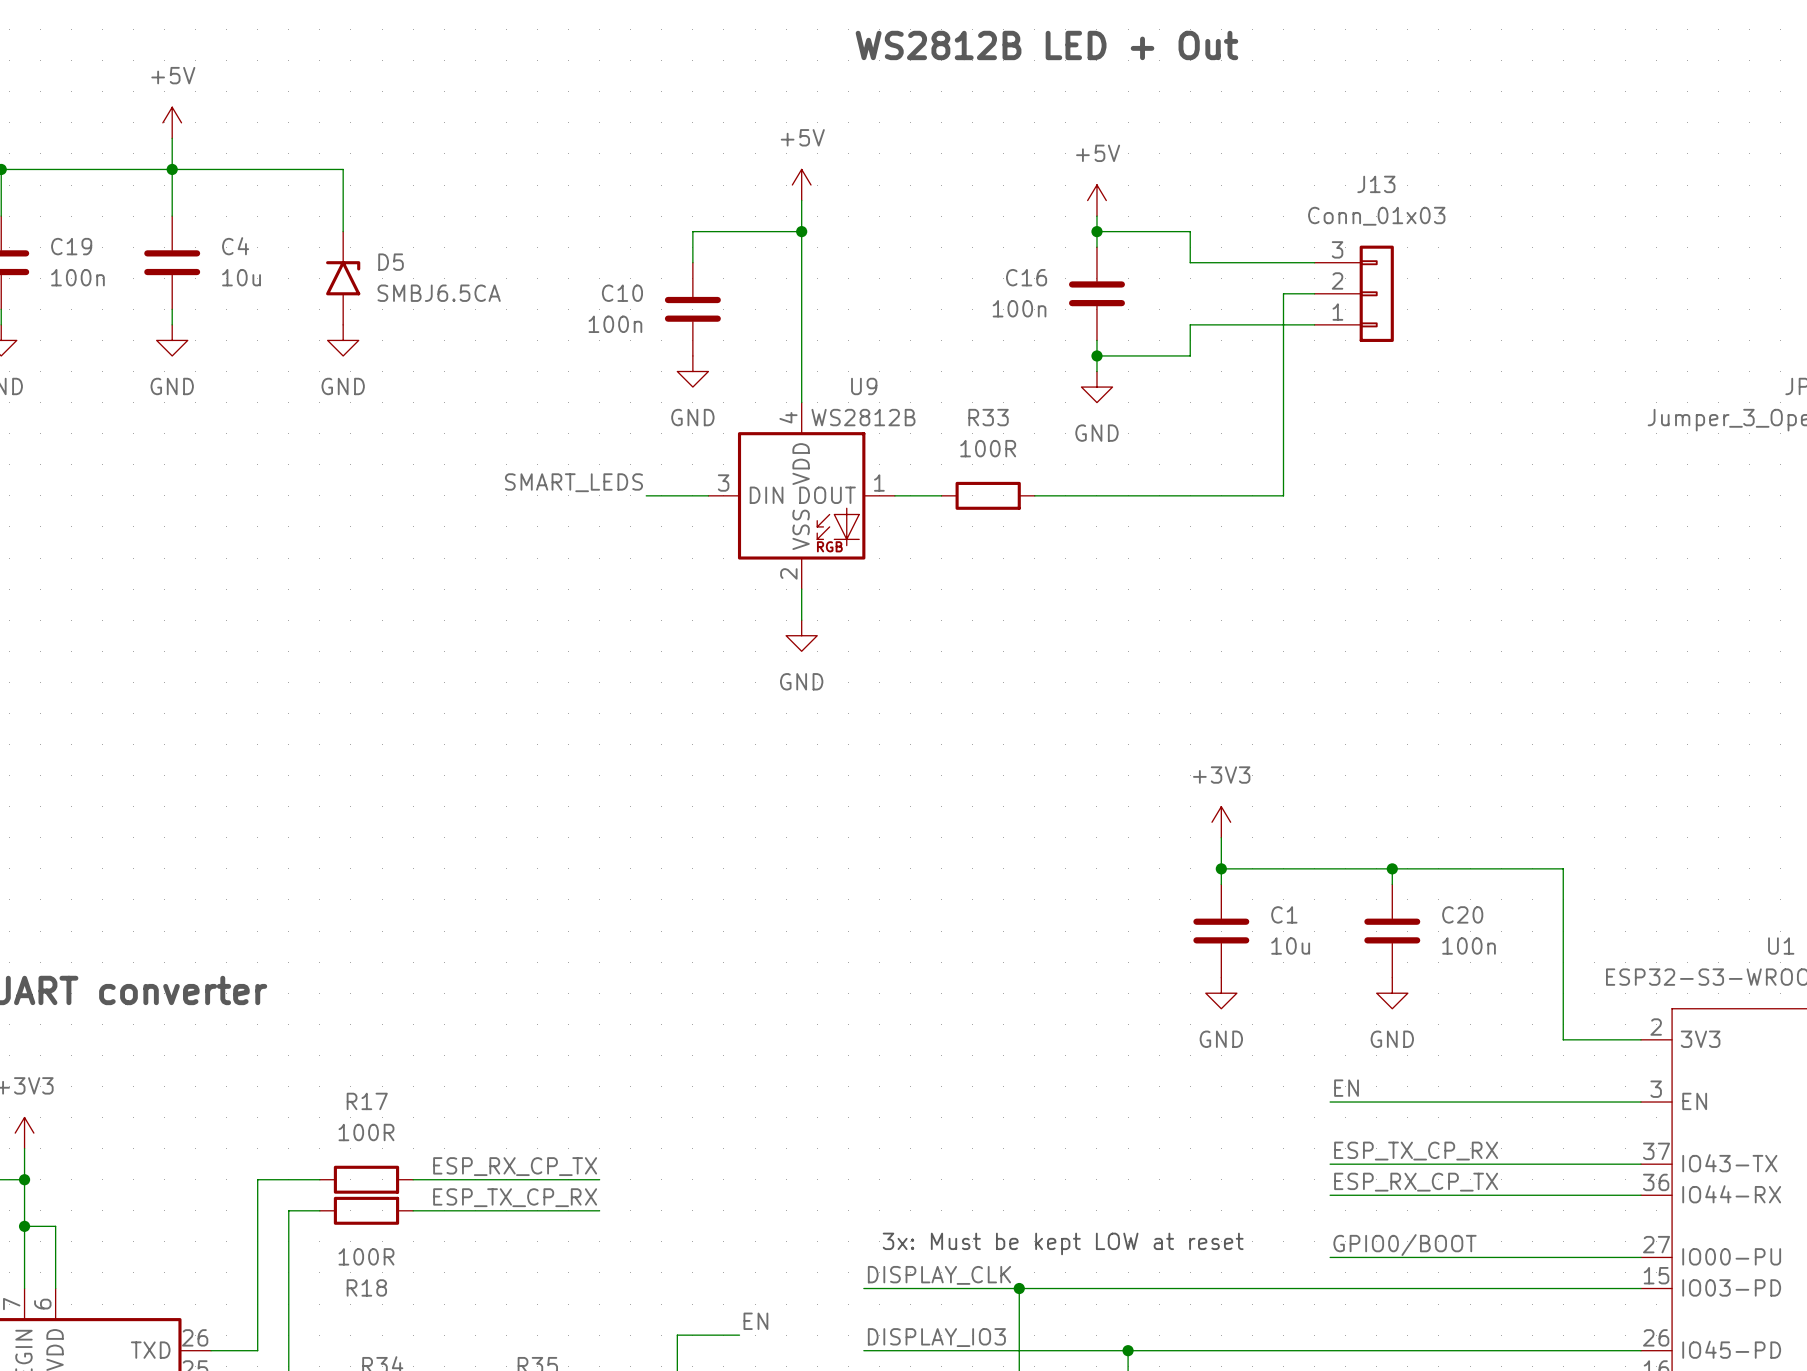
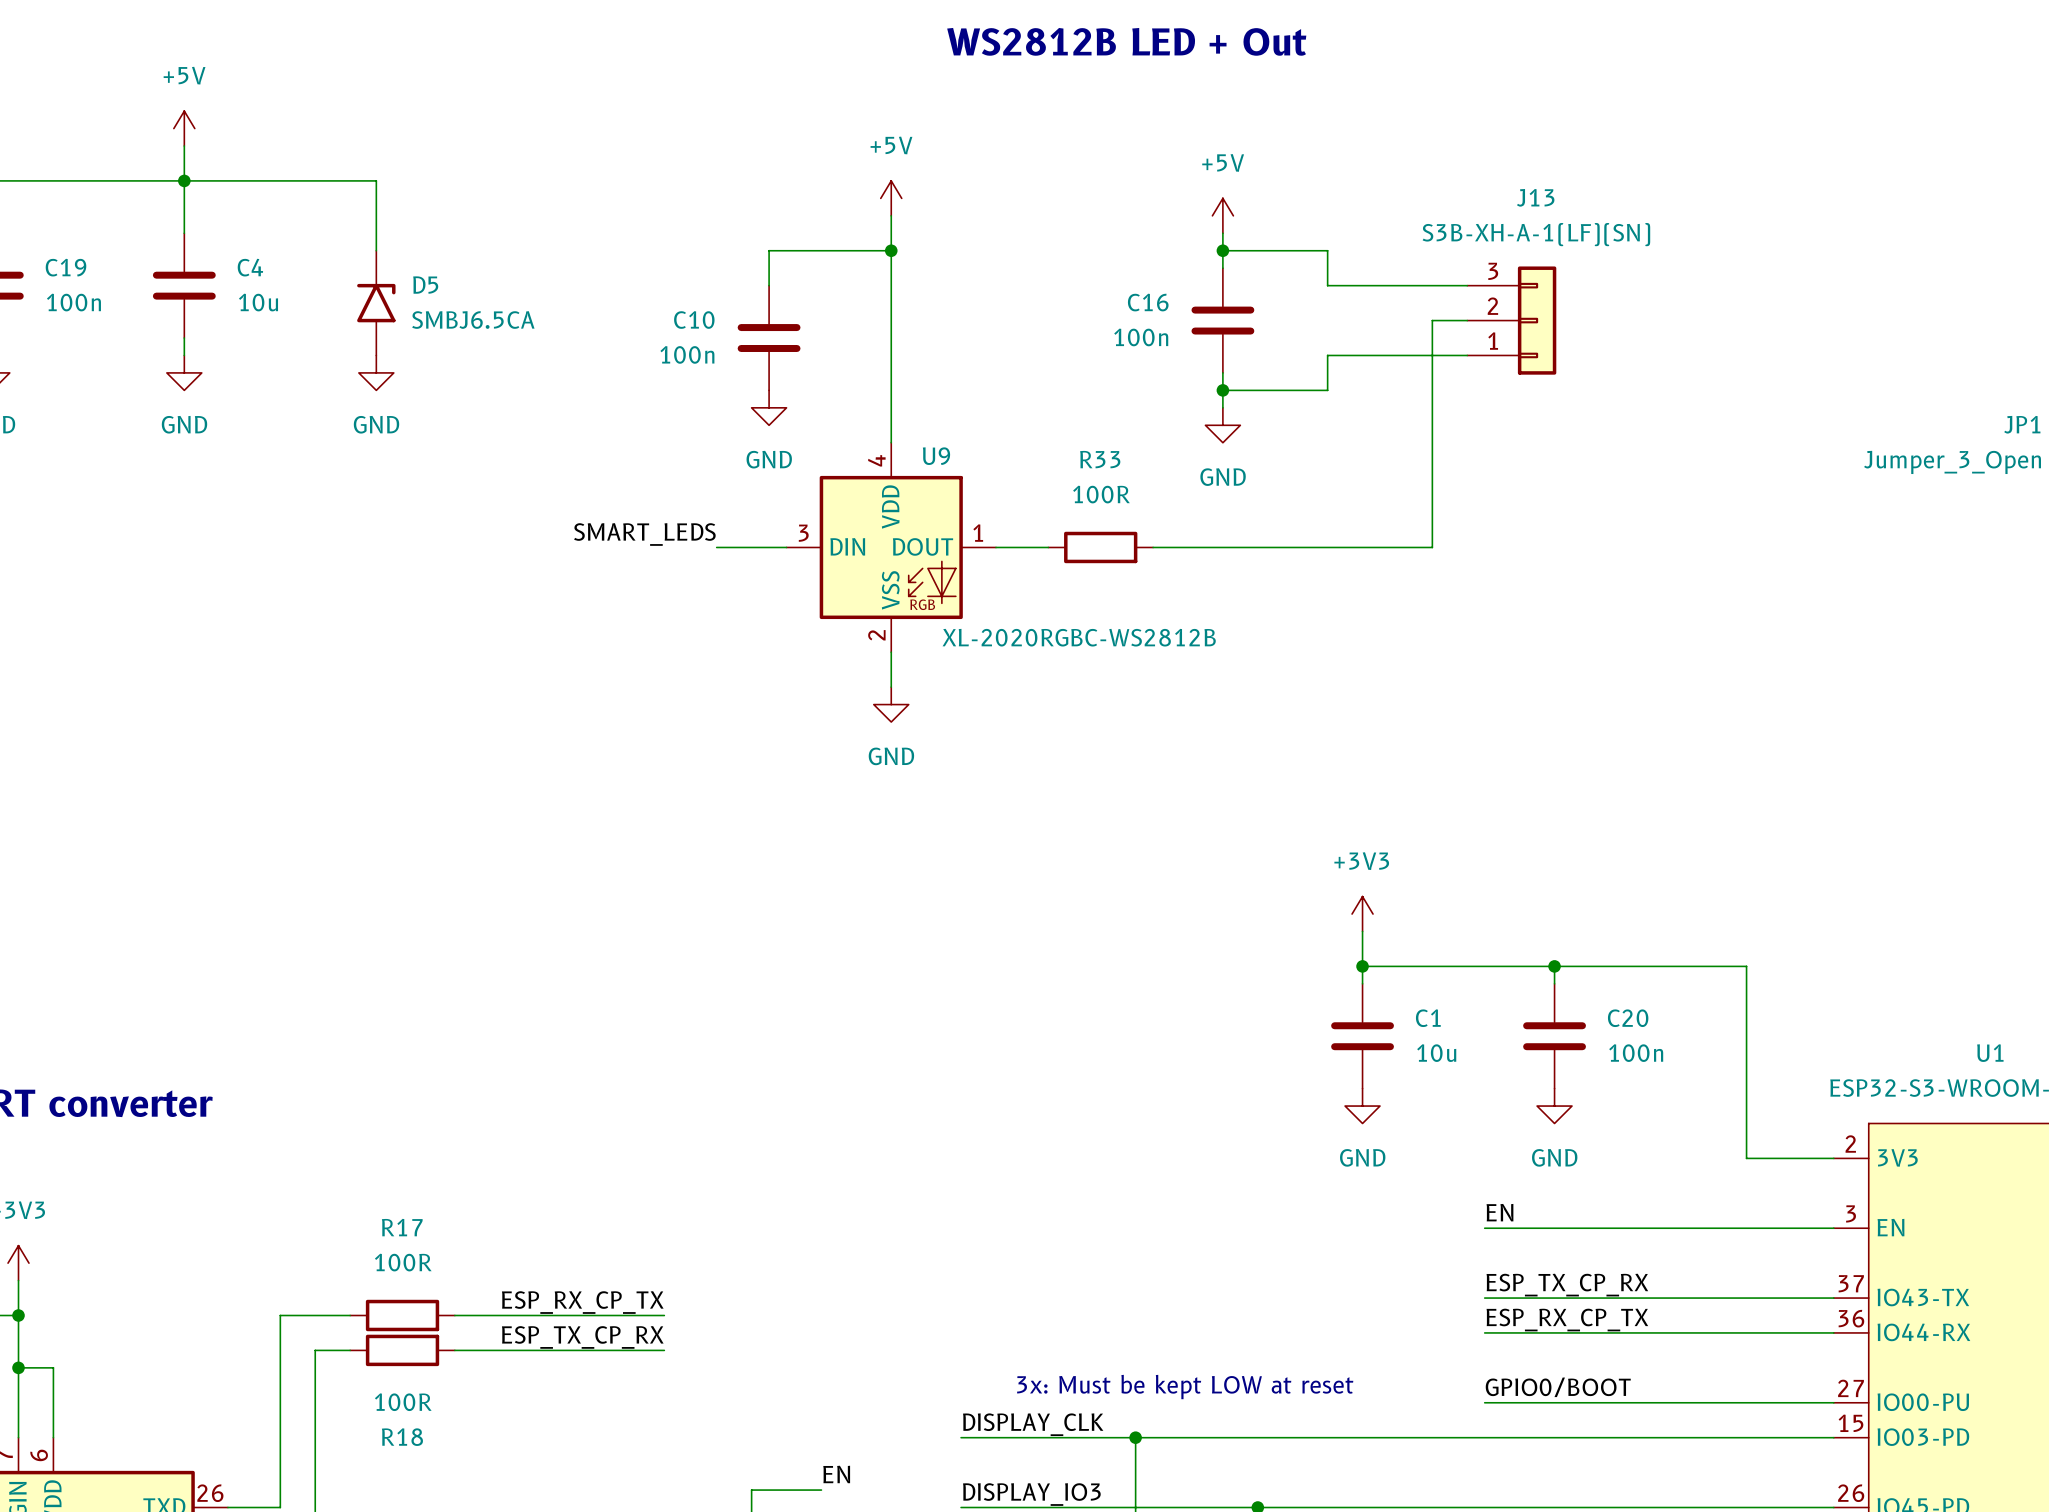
J13 value: Conn_01x03 (1376, 216) -> S3B-XH-A-1(LF)(SN) (1536, 234)
U9 name position: U9 (864, 386) -> U9 (936, 456)
U9 value: WS2812B (863, 417) -> XL-2020RGBC-WS2812B (1079, 637)

